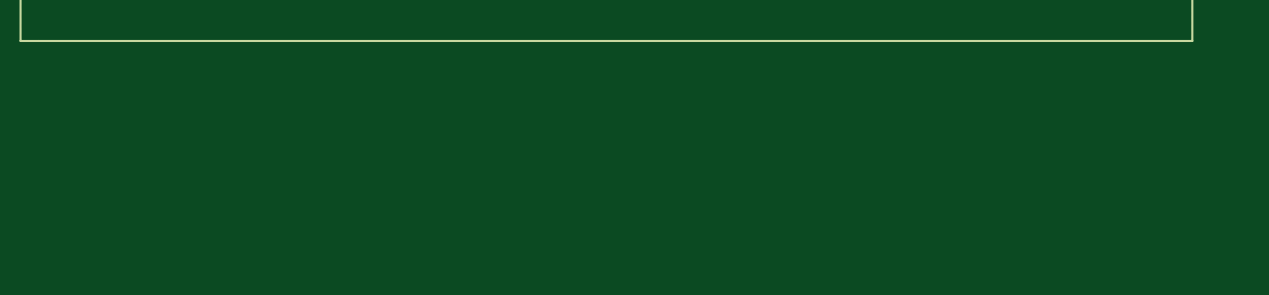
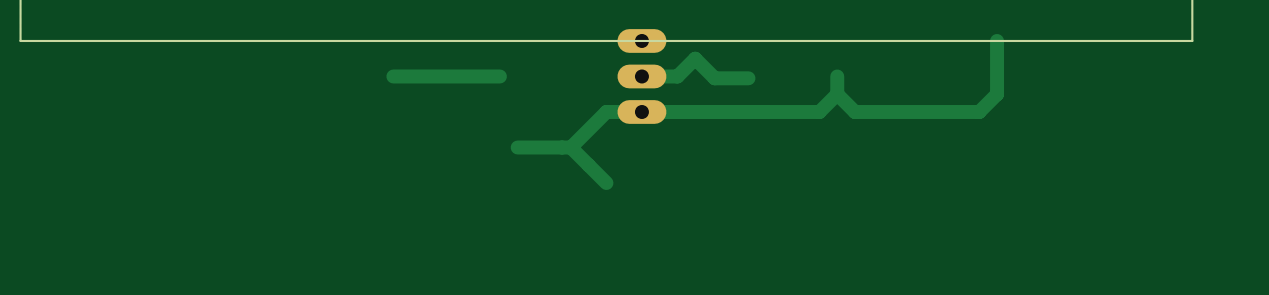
track: none -> (997, 40) (997, 94) (979, 111) (855, 111) (837, 94)
track: none -> (499, 76) (393, 76)
track: none -> (641, 76) (677, 76) (695, 58) (714, 78) (748, 78)
part: none -> (641, 76)
track: none -> (837, 76) (837, 94)
track: none -> (837, 94) (819, 111) (606, 111) (570, 147)
track: none -> (570, 147) (517, 147)
track: none -> (570, 147) (606, 183)

